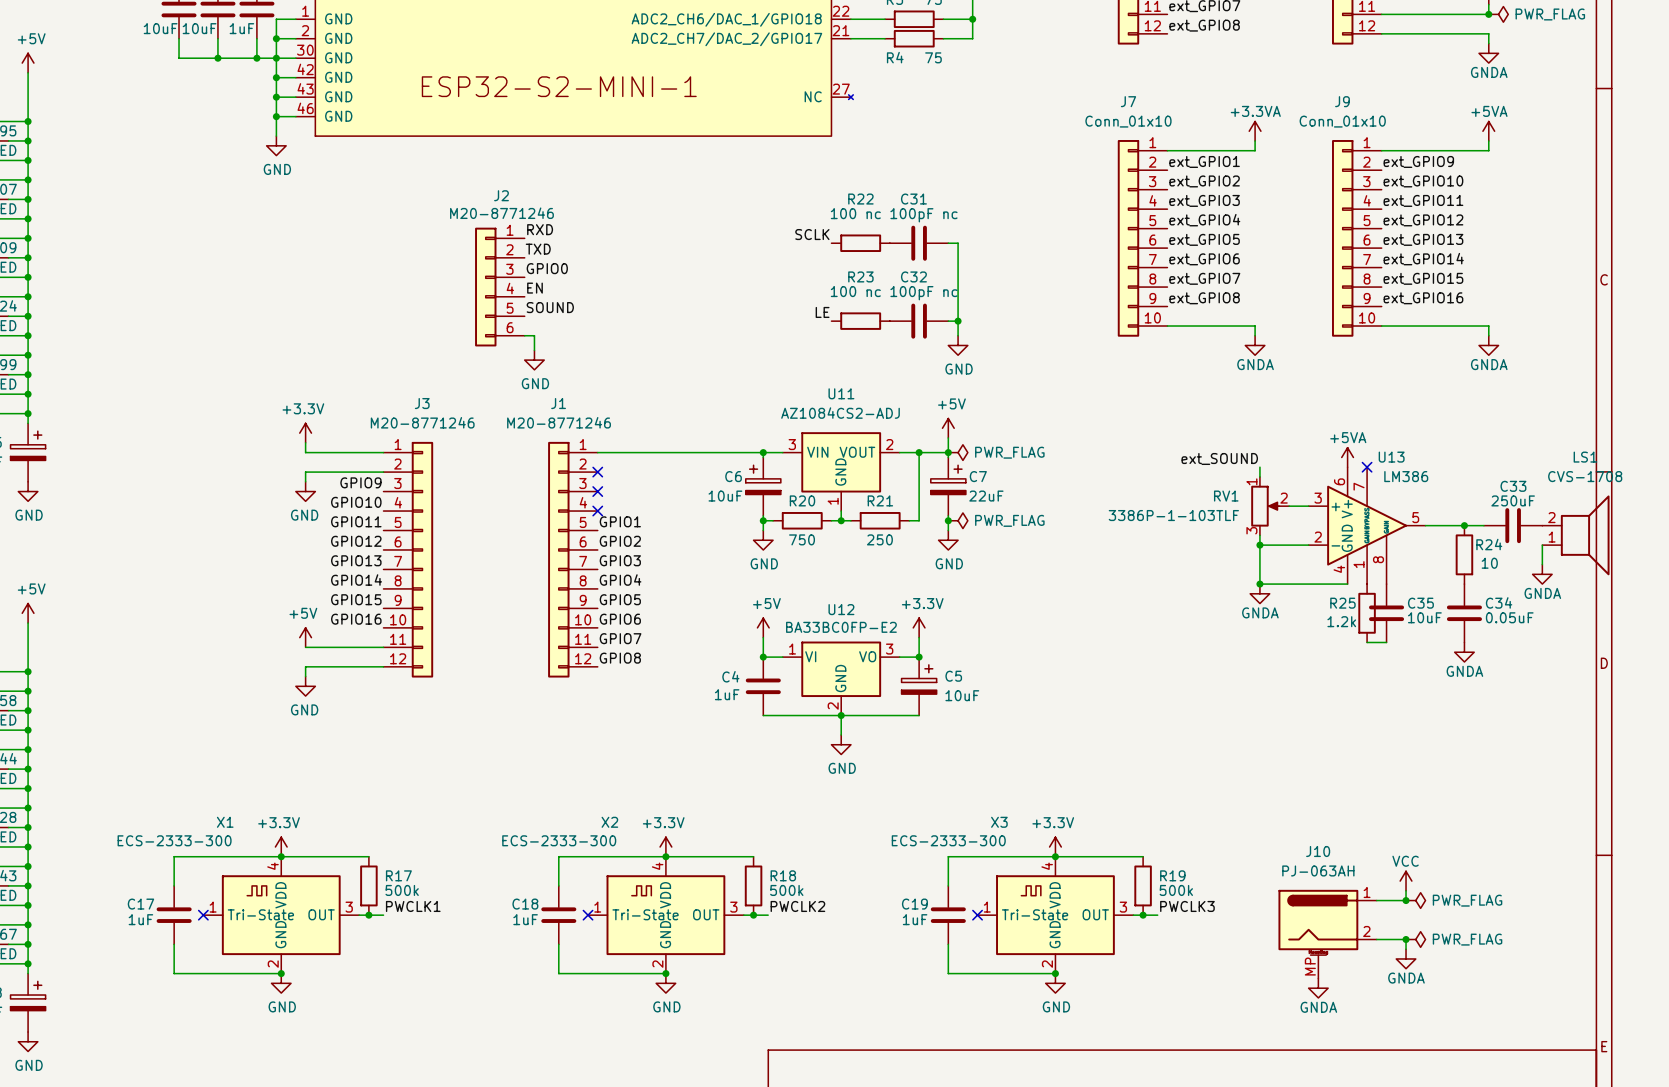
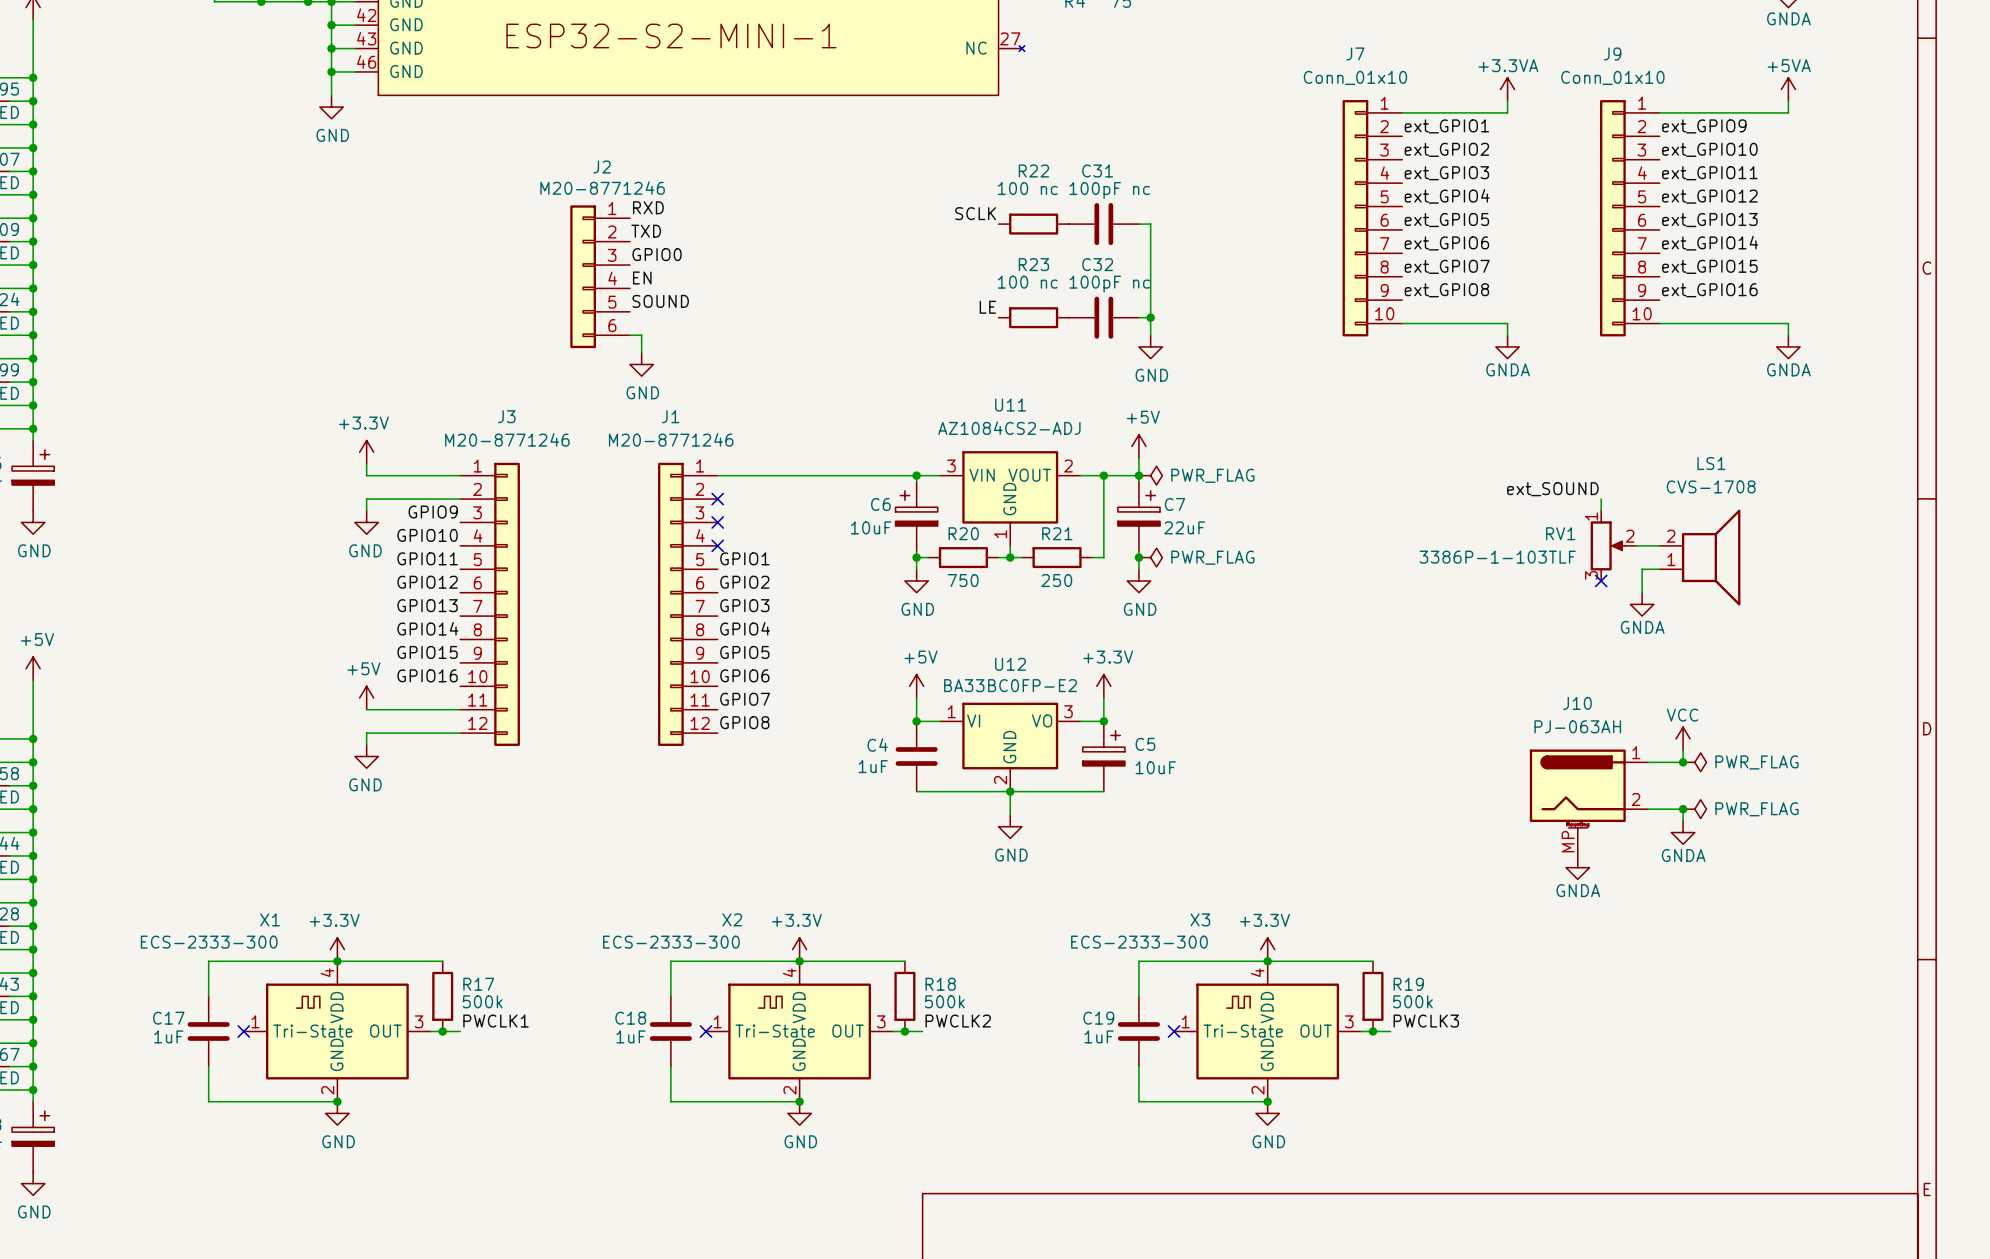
power symbol: +5VA (1347, 457) -> none
label position: ext_SOUND (1219, 458) -> ext_SOUND (1552, 489)
wire: (1259, 467) (1259, 476) -> (1601, 499) (1601, 510)
no-connect mark: (1367, 467) -> none
RV1 position: (1270, 506) -> (1613, 545)
U13: LM386 (1367, 525) -> none
wire: (1425, 525) (1483, 525) -> none
junction: (1464, 525) -> none
C33: 250uF (1513, 525) -> none
wire: (1259, 535) (1259, 584) (1347, 584) -> none
LS1 position: (1575, 535) -> (1700, 557)
no-connect mark: none -> (1601, 580)
wire: (1259, 545) (1308, 545) -> none
junction: (1259, 545) -> none
wire: (1542, 545) (1542, 564) -> none
R24: 10 (1464, 554) -> none
power symbol: none -> GNDA (1642, 604)
power symbol: GNDA (1542, 574) -> none
junction: (1259, 584) -> none
power symbol: GNDA (1259, 593) -> none
R25: 1.2k (1367, 613) -> none
C35: 10uF (1386, 613) -> none
C34: 0.05uF (1464, 613) -> none
wire: (1367, 642) (1386, 642) -> none
power symbol: GNDA (1464, 652) -> none
power symbol: none -> VCC (1683, 738)
wire: none -> (1683, 750) (1683, 762) (1647, 762)
junction: none -> (1683, 762)
power symbol: none -> PWR_FLAG (1694, 762)
wire: none -> (1647, 809) (1683, 809) (1683, 820)
junction: none -> (1683, 809)
power symbol: none -> PWR_FLAG (1694, 809)
power symbol: none -> GNDA (1683, 832)
power symbol: none -> GNDA (1577, 867)
power symbol: VCC (1406, 881) -> none
wire: (1406, 890) (1406, 900) (1376, 900) -> none
junction: (1406, 900) -> none
power symbol: PWR_FLAG (1415, 900) -> none
J10 position: (1327, 934) -> (1588, 802)
wire: (1376, 939) (1406, 939) (1406, 949) -> none
junction: (1406, 939) -> none
power symbol: PWR_FLAG (1415, 939) -> none
power symbol: GNDA (1406, 958) -> none
power symbol: GNDA (1318, 988) -> none

